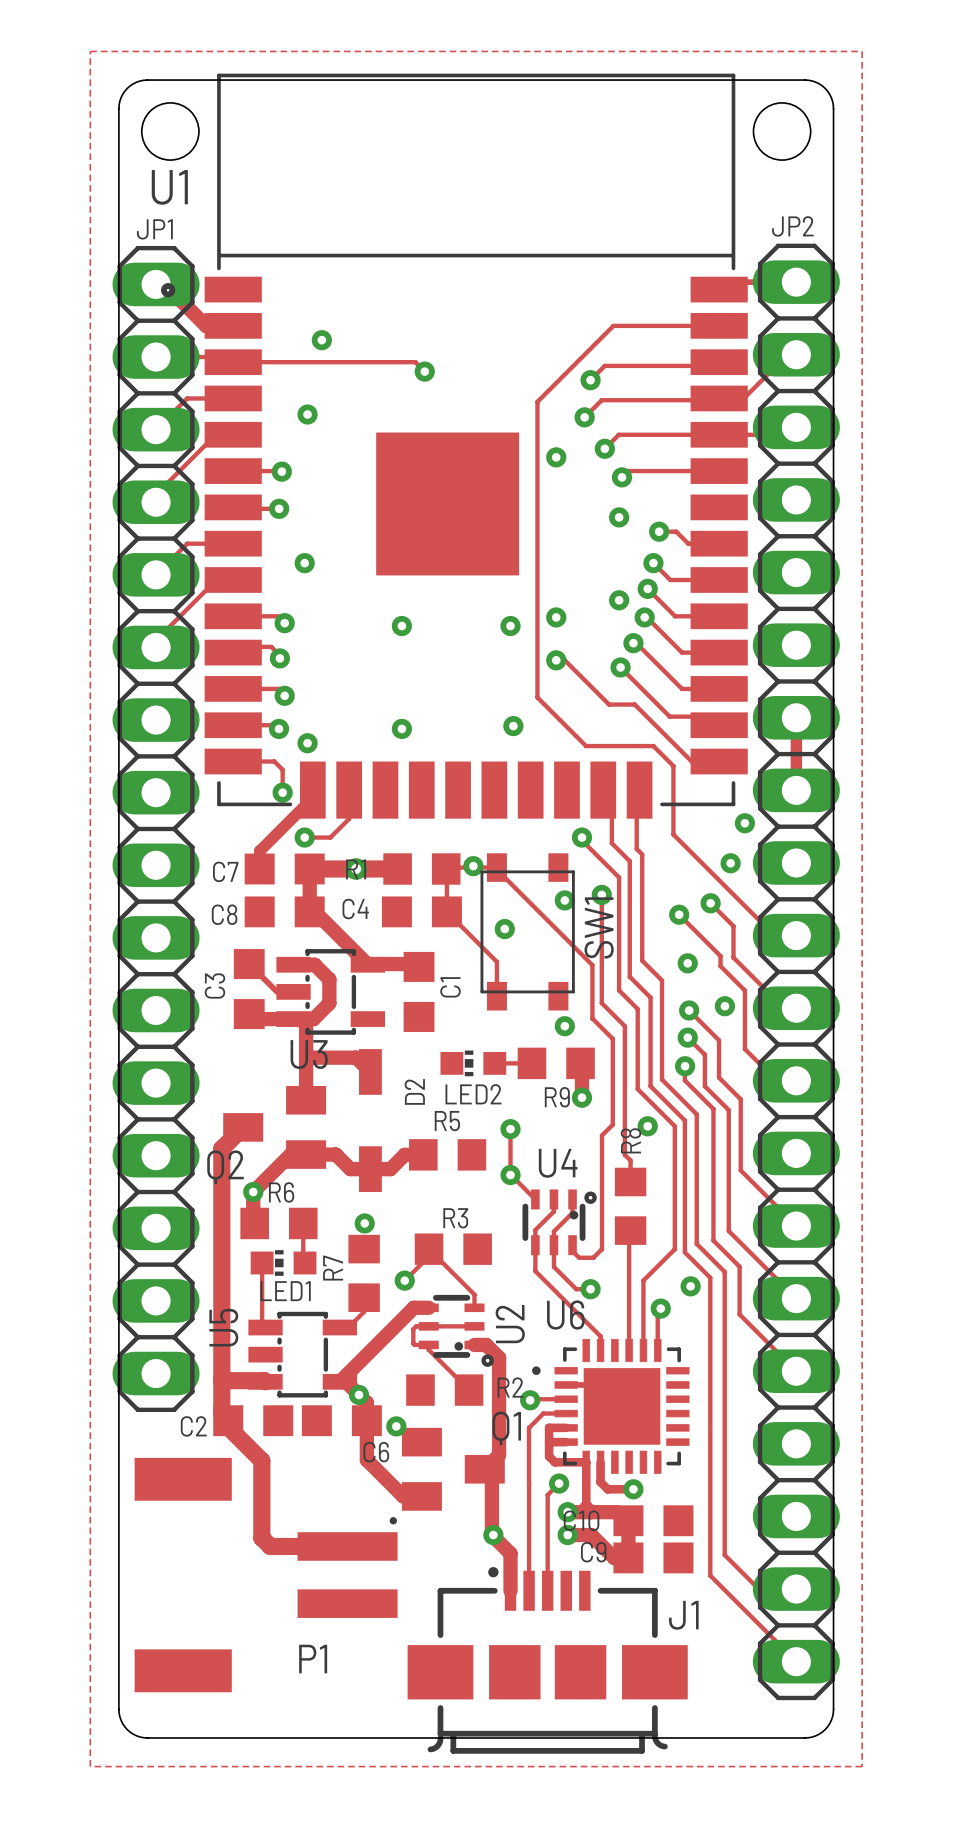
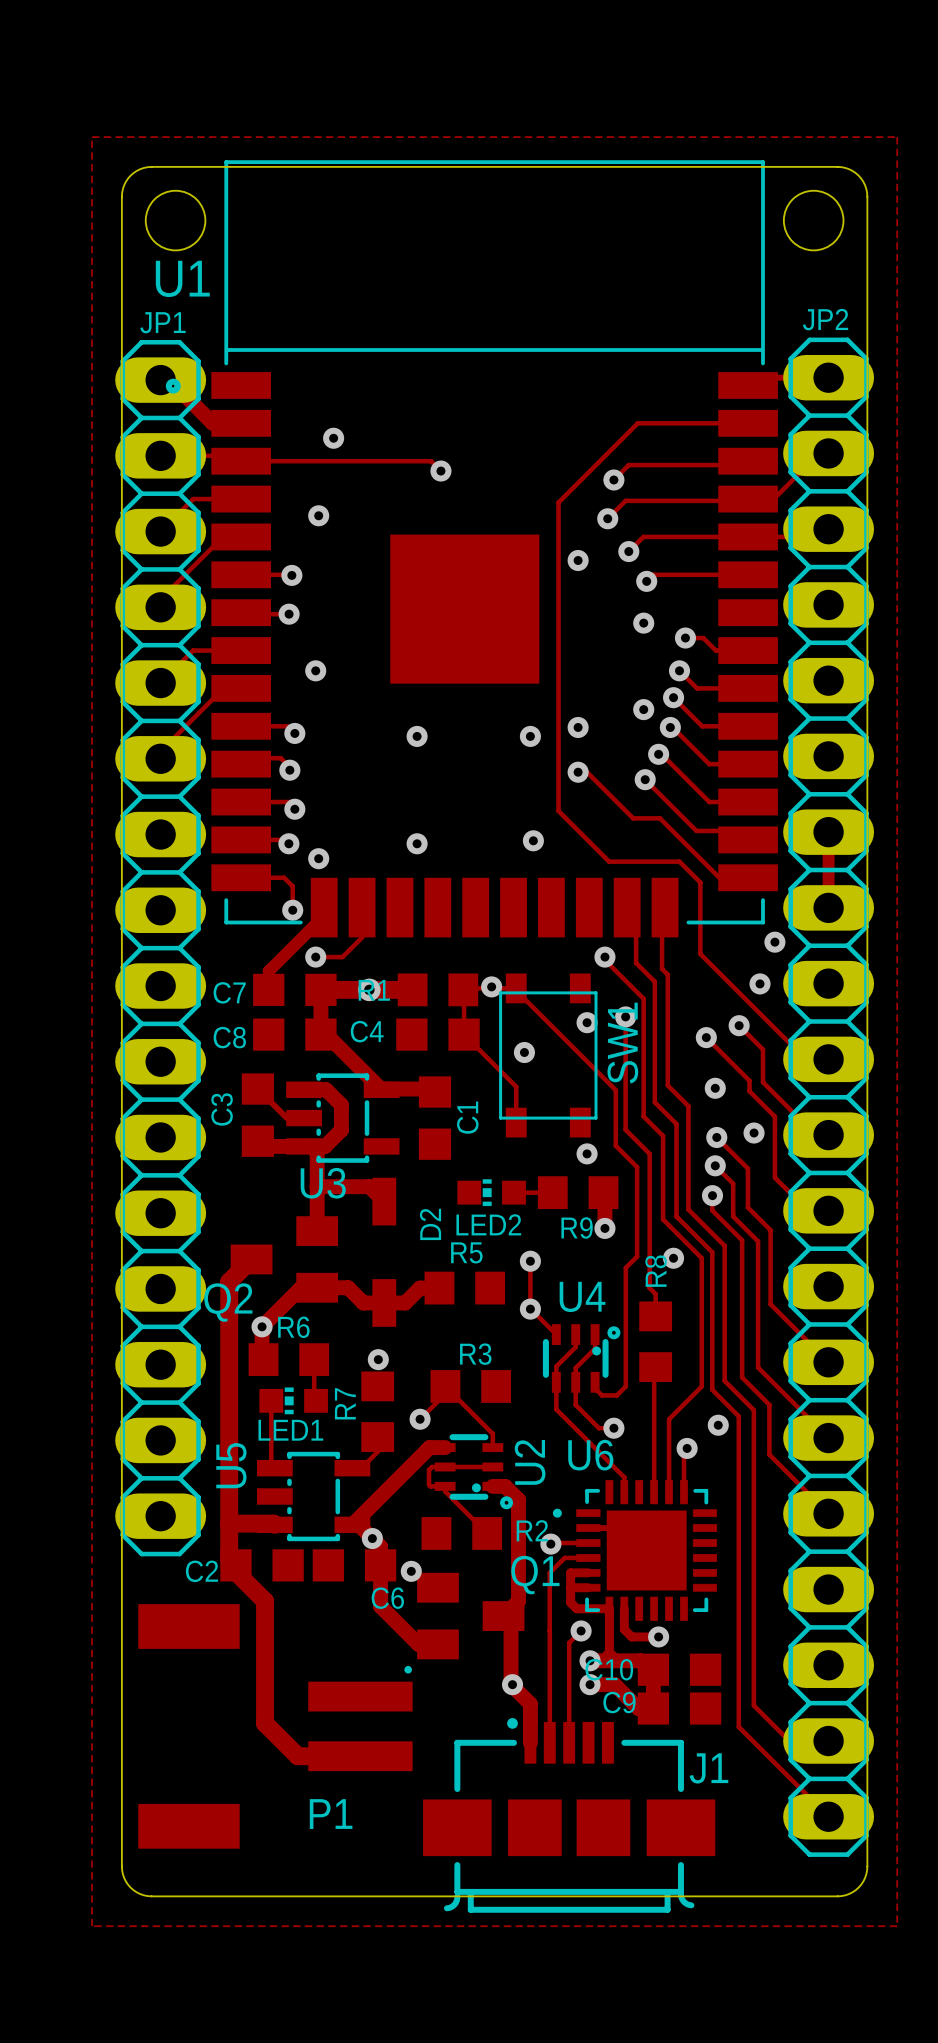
track: (256, 1455) (261, 1460) (261, 1537) (270, 1546) (347, 1546) -> (265, 1601) (265, 1723) (297, 1756) (360, 1756)

